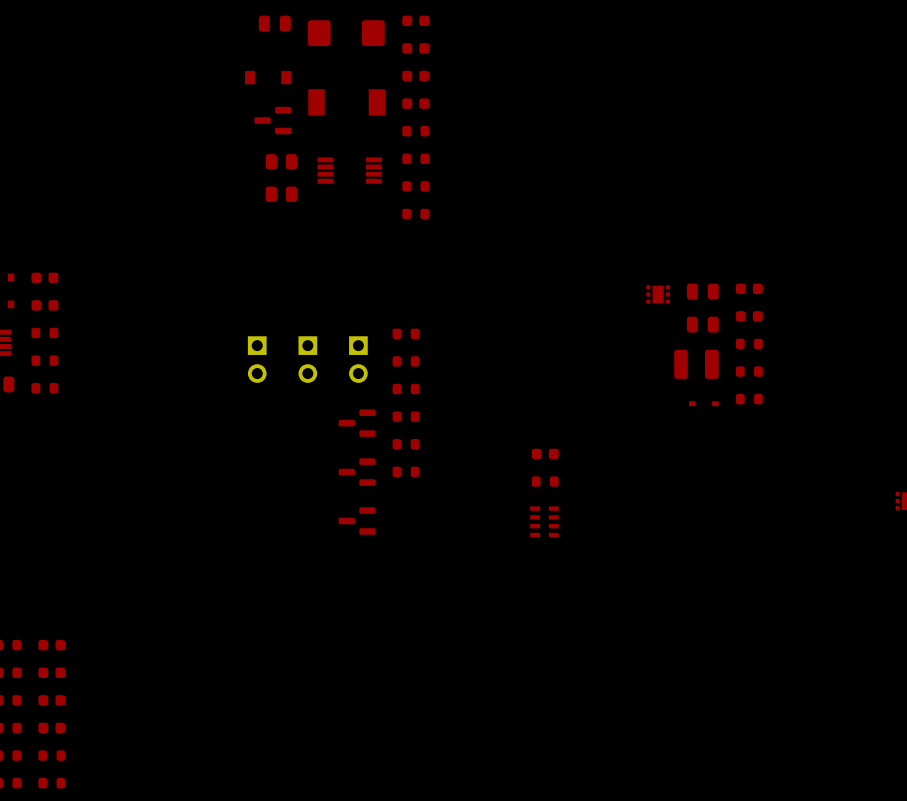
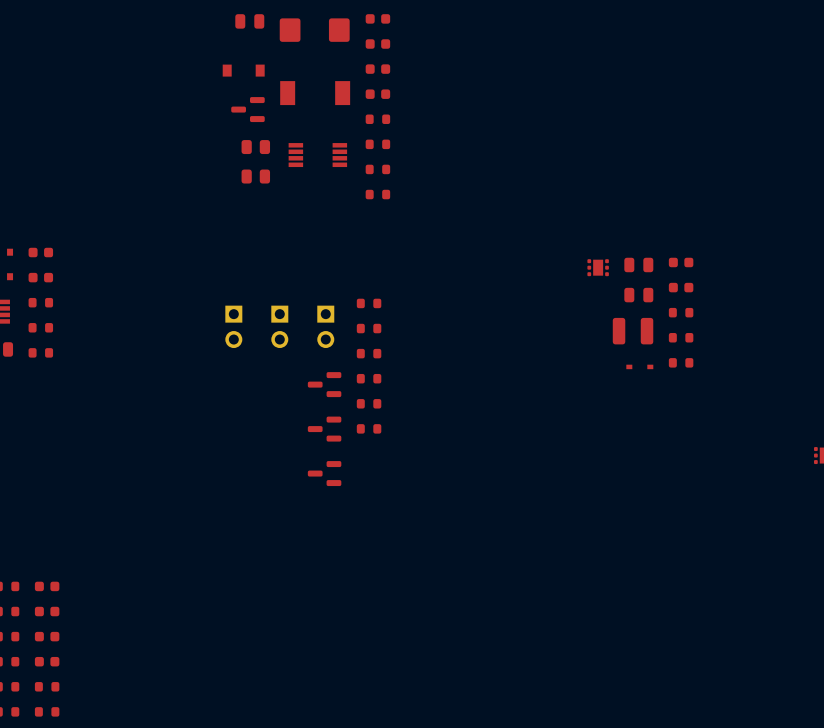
part: (545, 453) -> none
part: (545, 481) -> none
part: (544, 521) -> none

